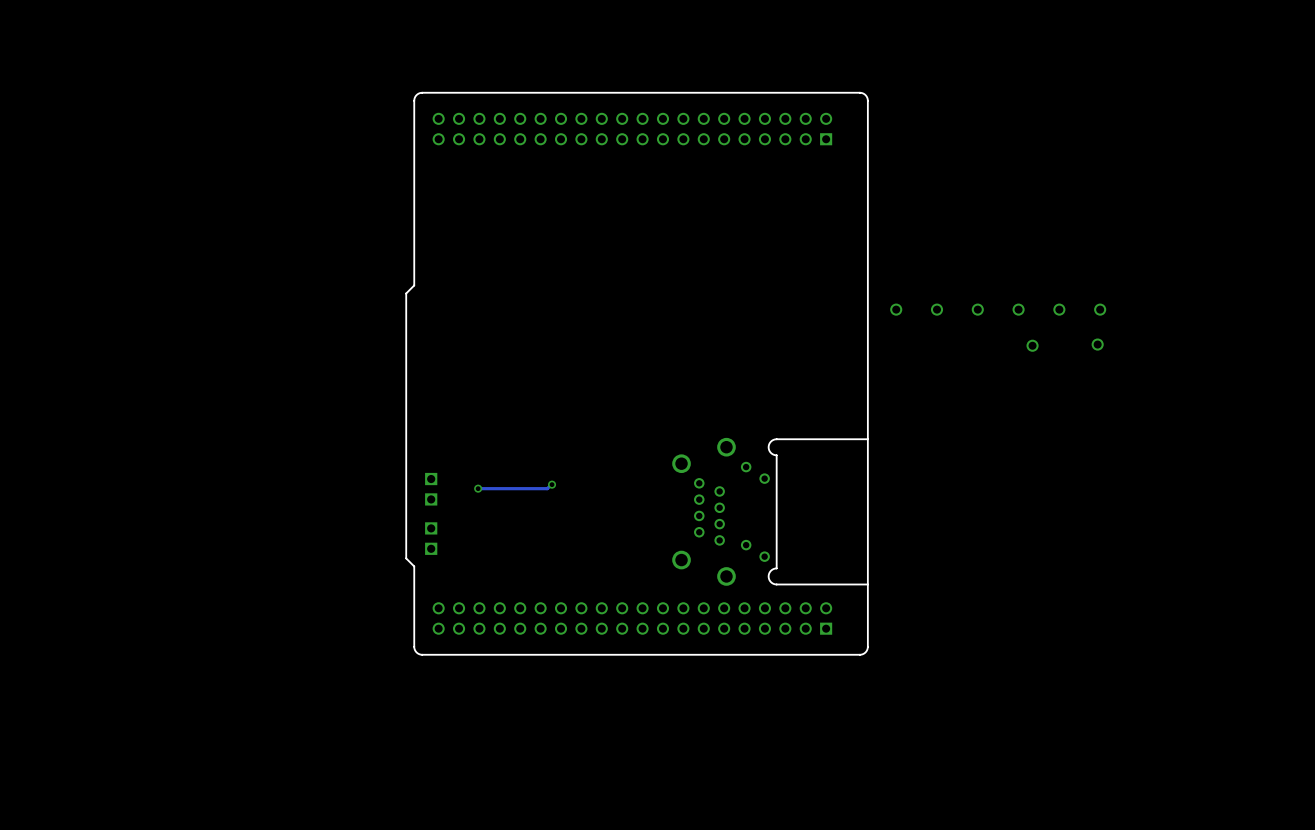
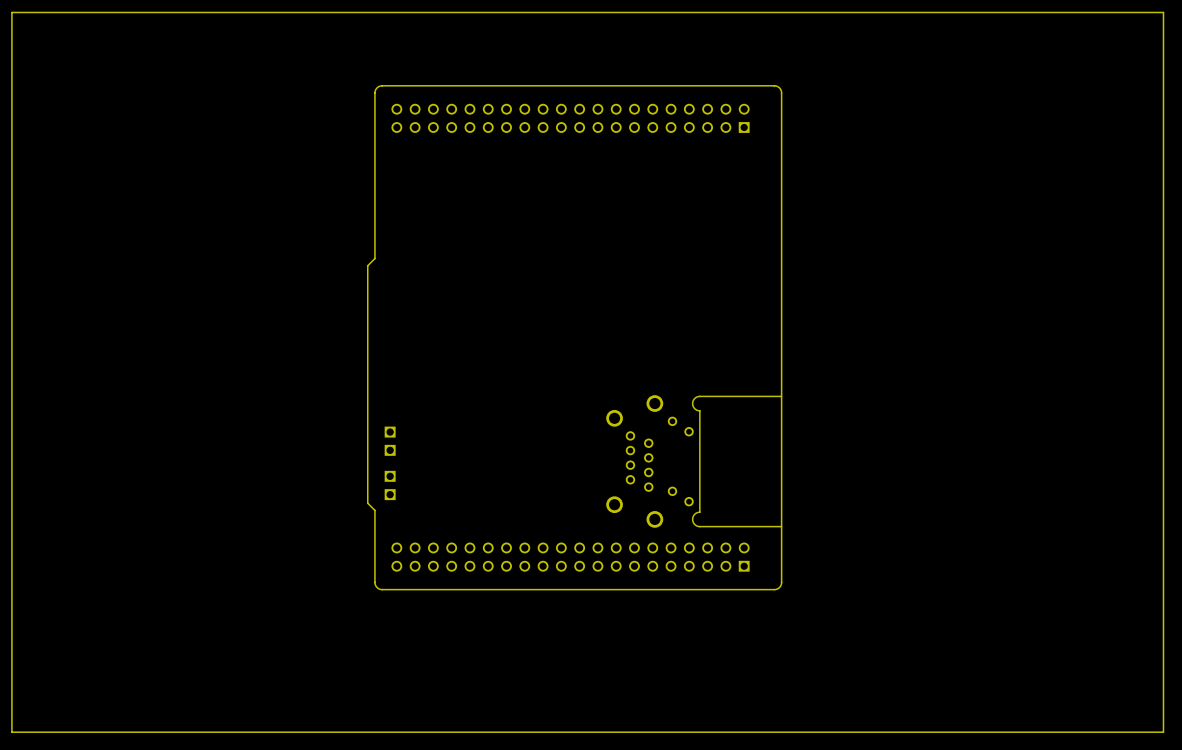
board edge: none -> (1163, 12) (11, 12) (11, 732) (1163, 732) (1163, 12)
part: (896, 309) -> none
part: (937, 309) -> none
part: (977, 309) -> none
part: (1018, 309) -> none
part: (1059, 309) -> none
part: (1100, 309) -> none
part: (1097, 344) -> none
part: (1032, 345) -> none
track: (552, 484) (547, 488) (478, 488) -> none
via: (552, 484) -> none
via: (478, 488) -> none

